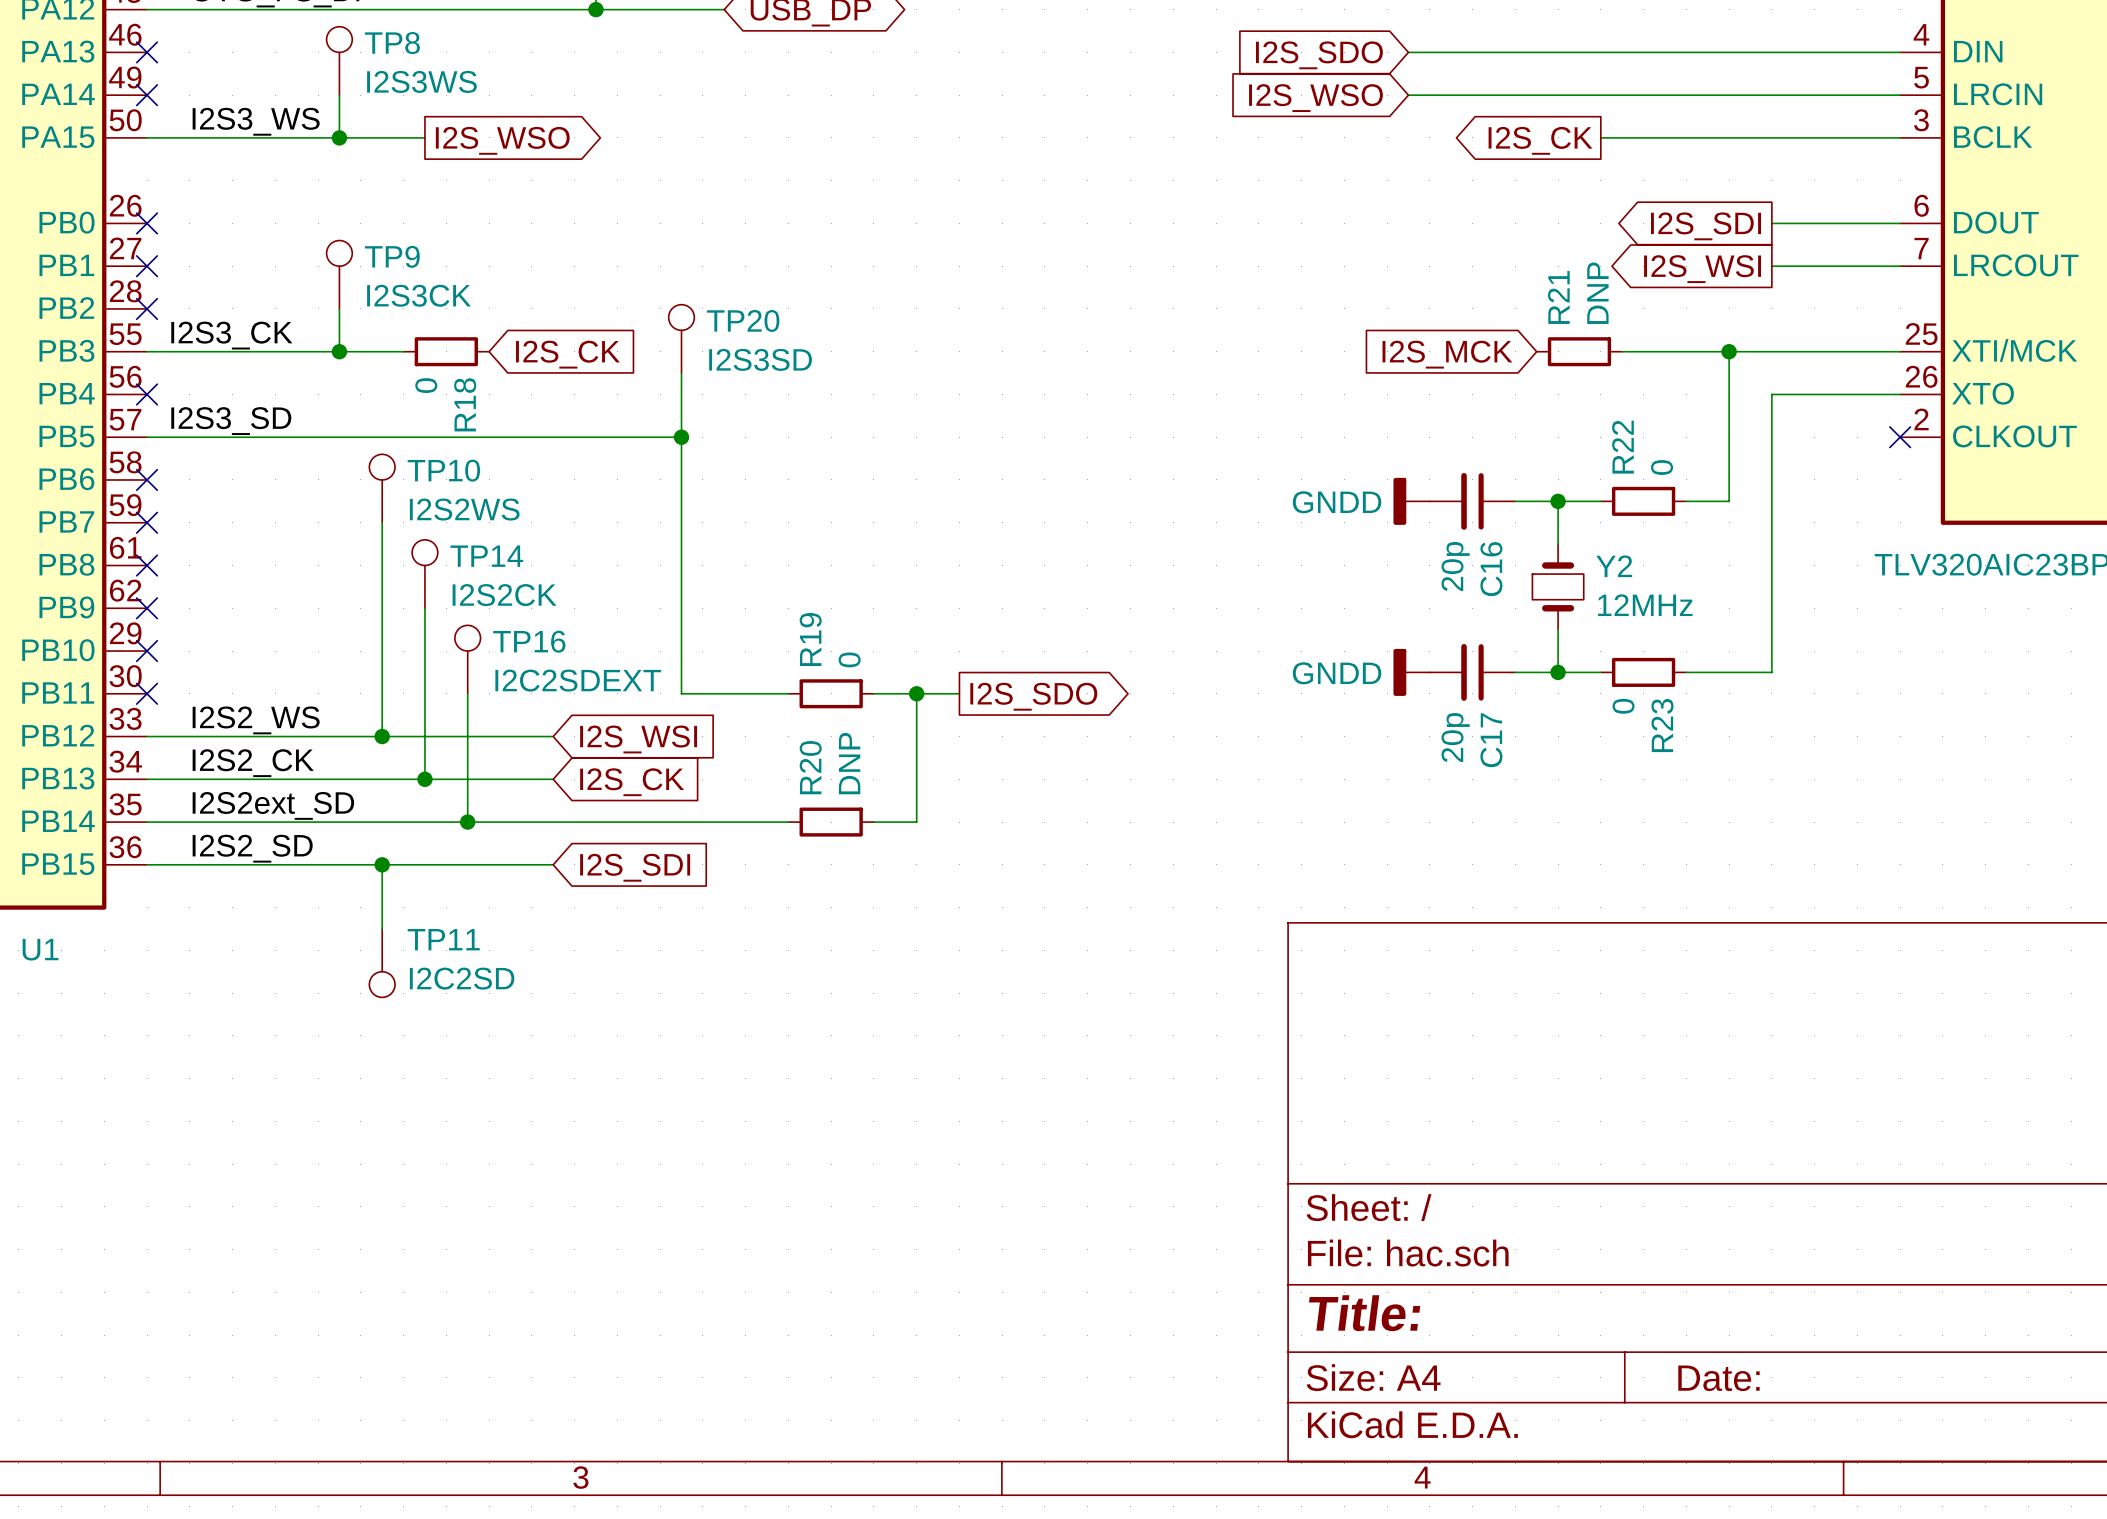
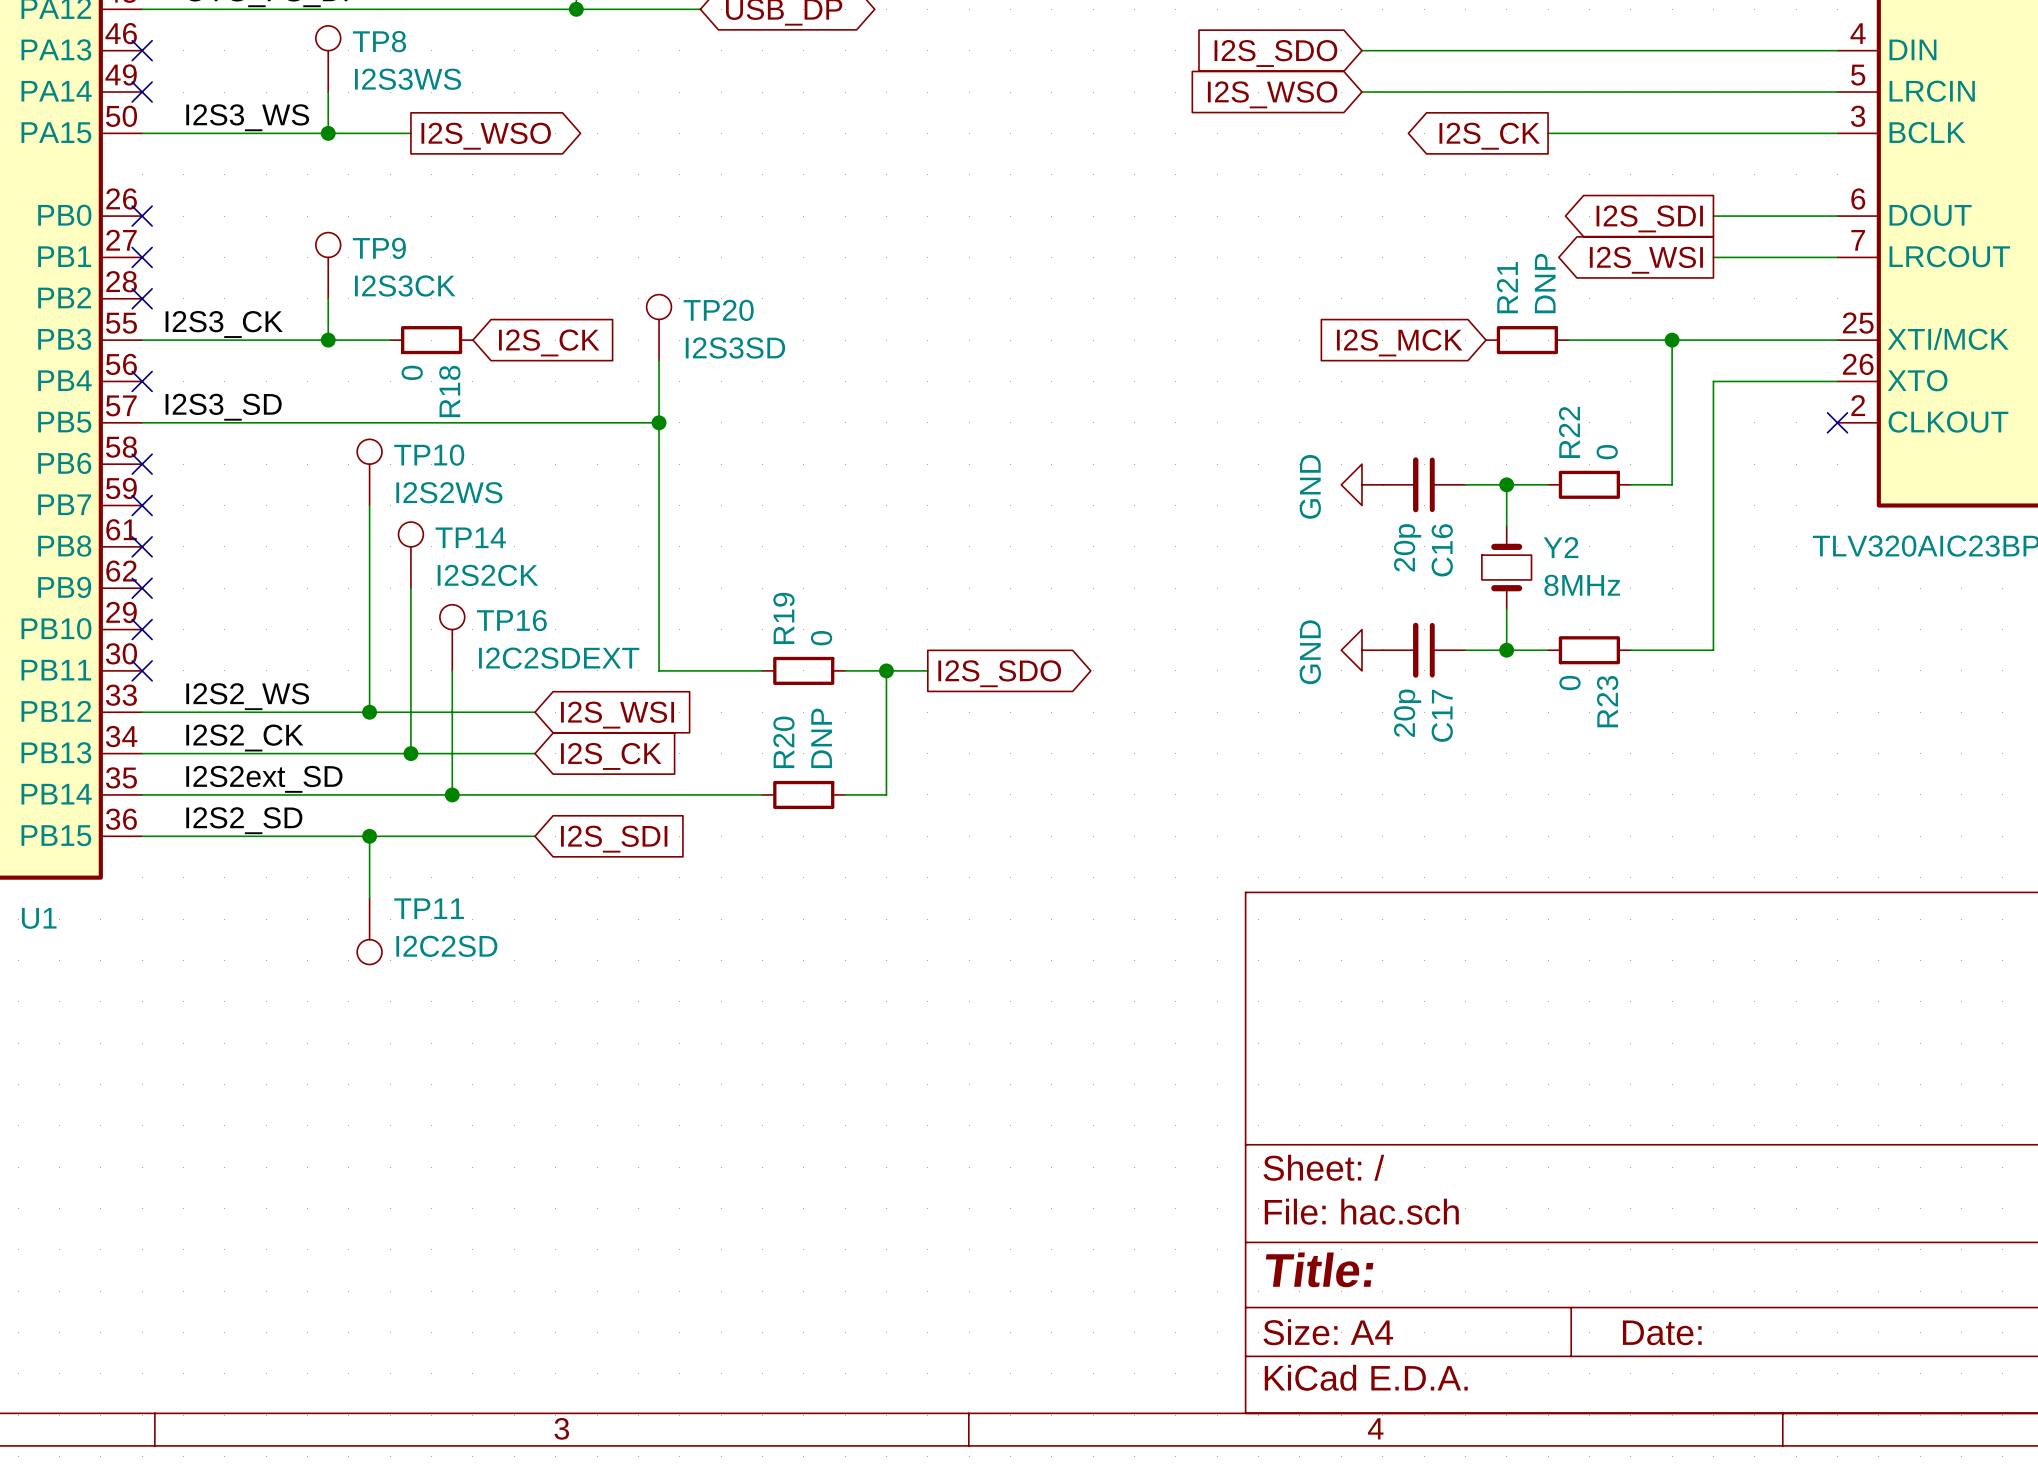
power symbol: GNDD (1411, 501) -> GND (1361, 484)
Y2 value: 12MHz (1645, 605) -> 8MHz (1582, 585)
power symbol: GNDD (1411, 672) -> GND (1361, 650)

